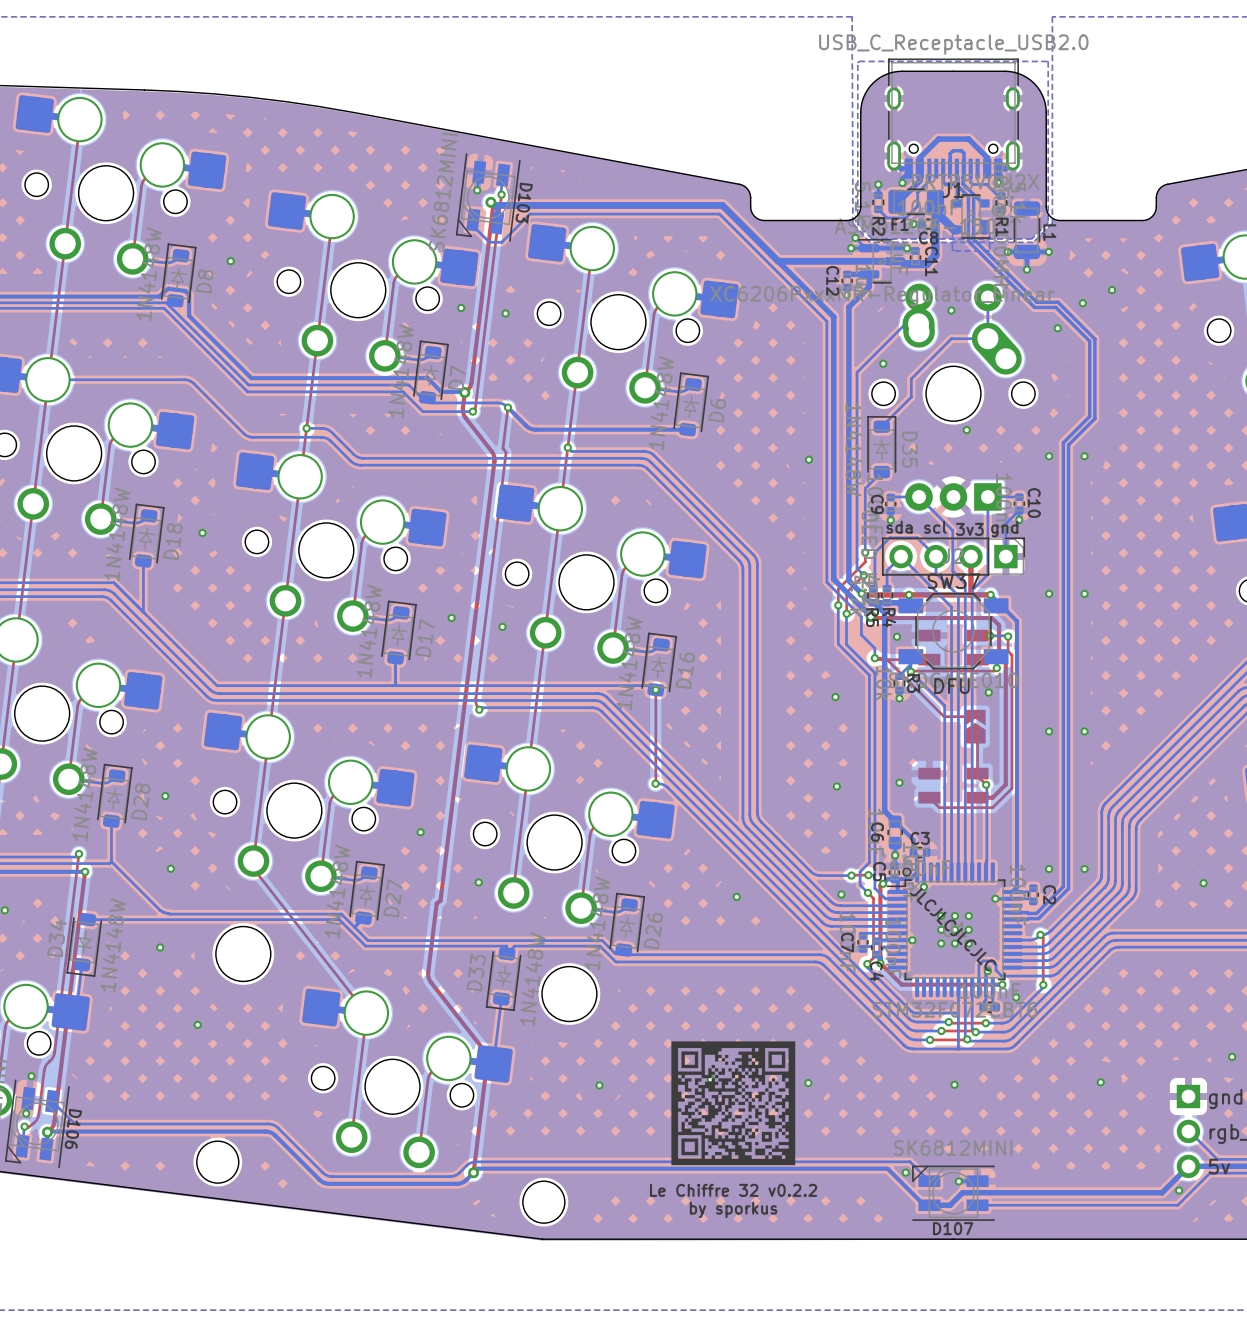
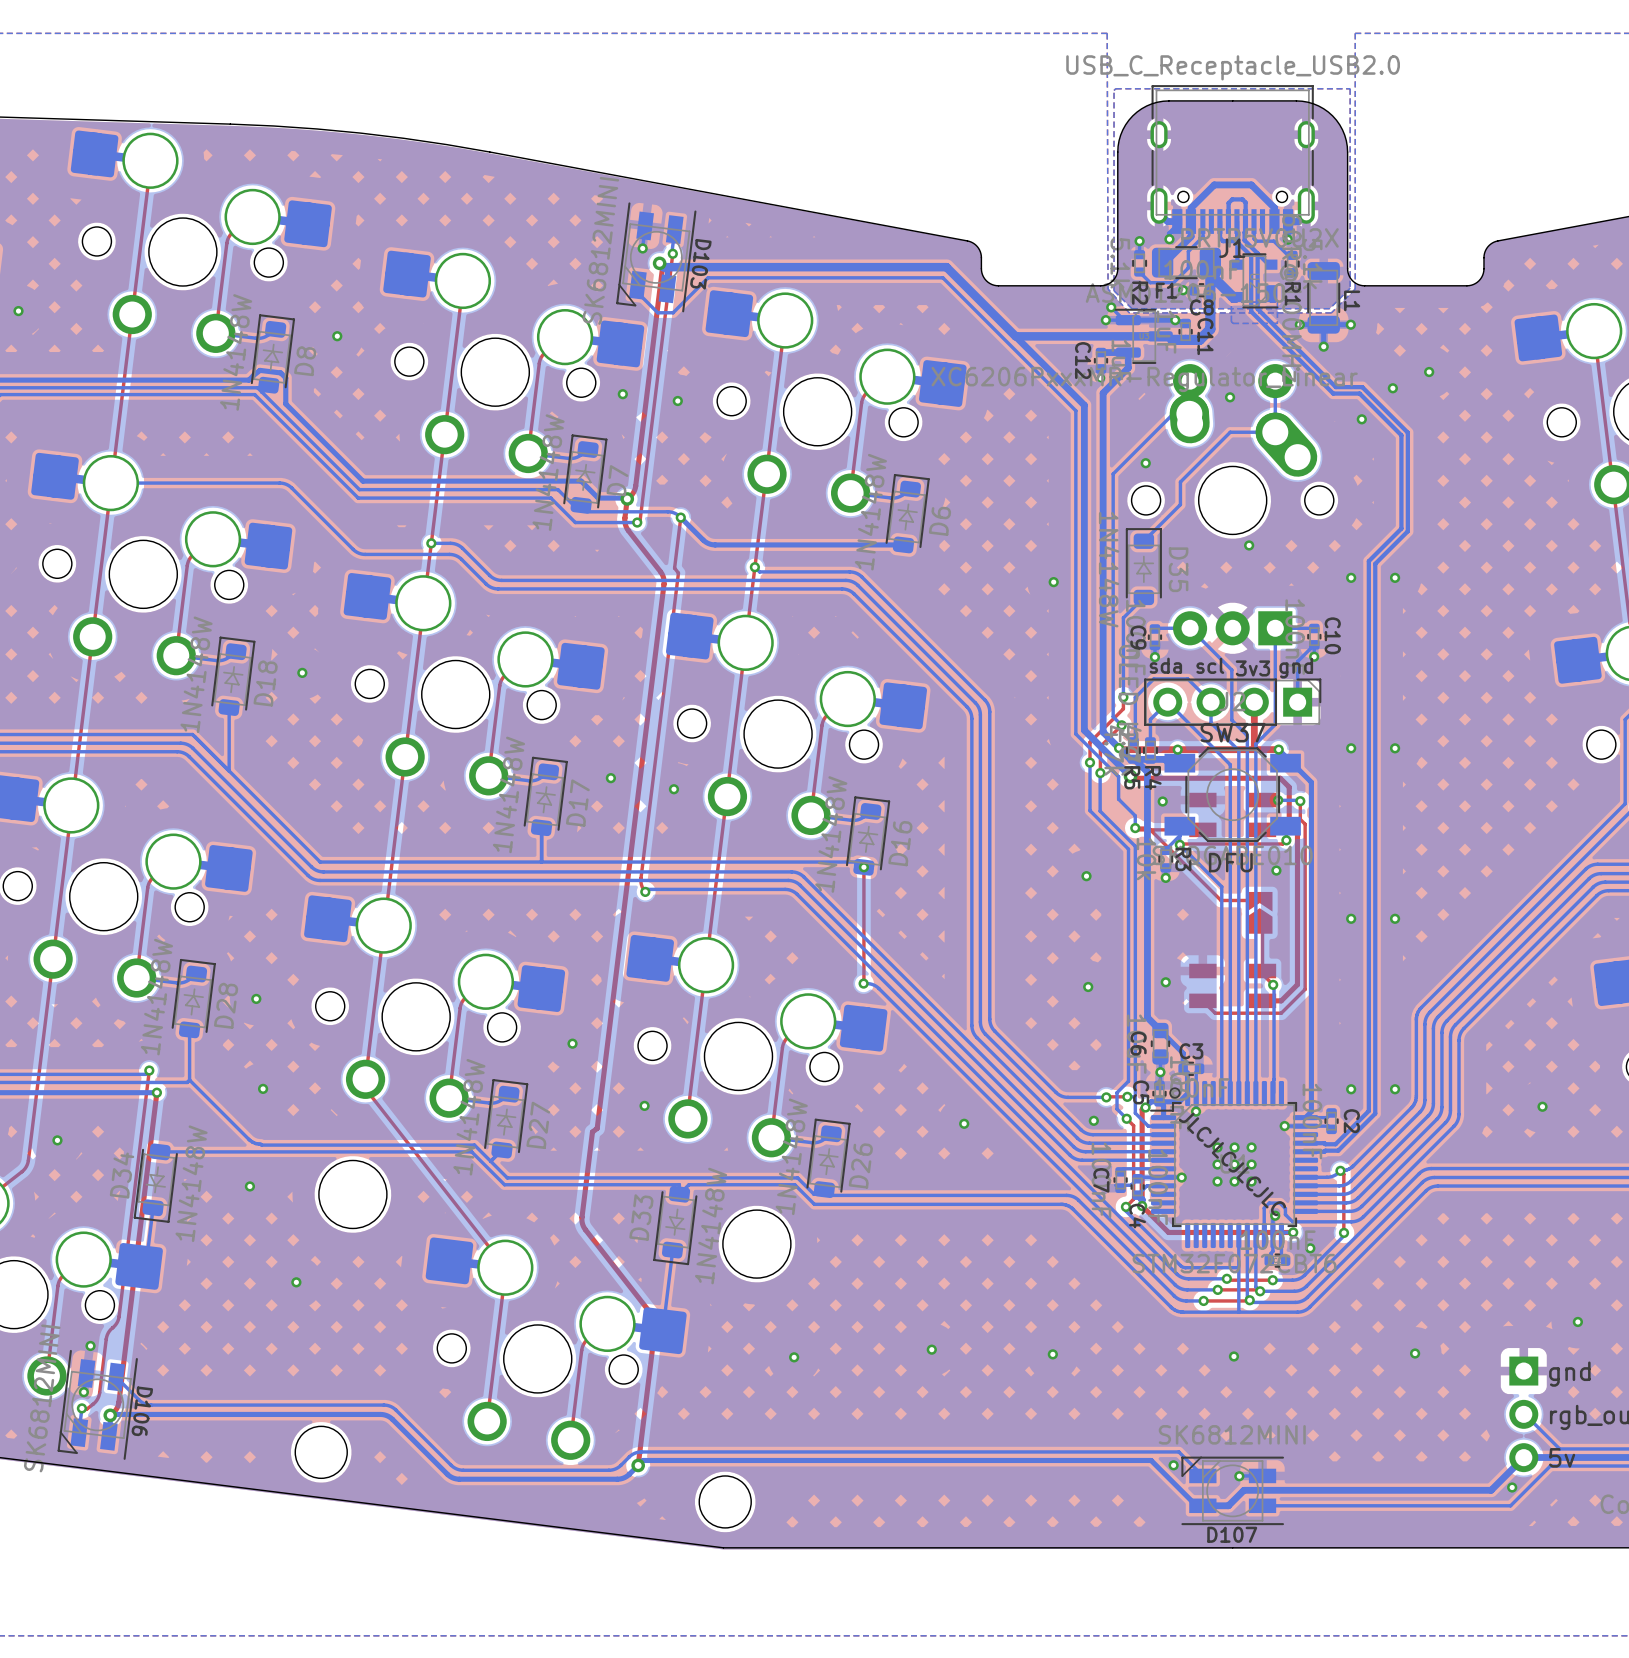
drawing: [671, 1041, 796, 1166] -> none
text: Le Chiffre 32 v0.2.2 (733, 1190) -> none
text: by sporkus (733, 1209) -> none

